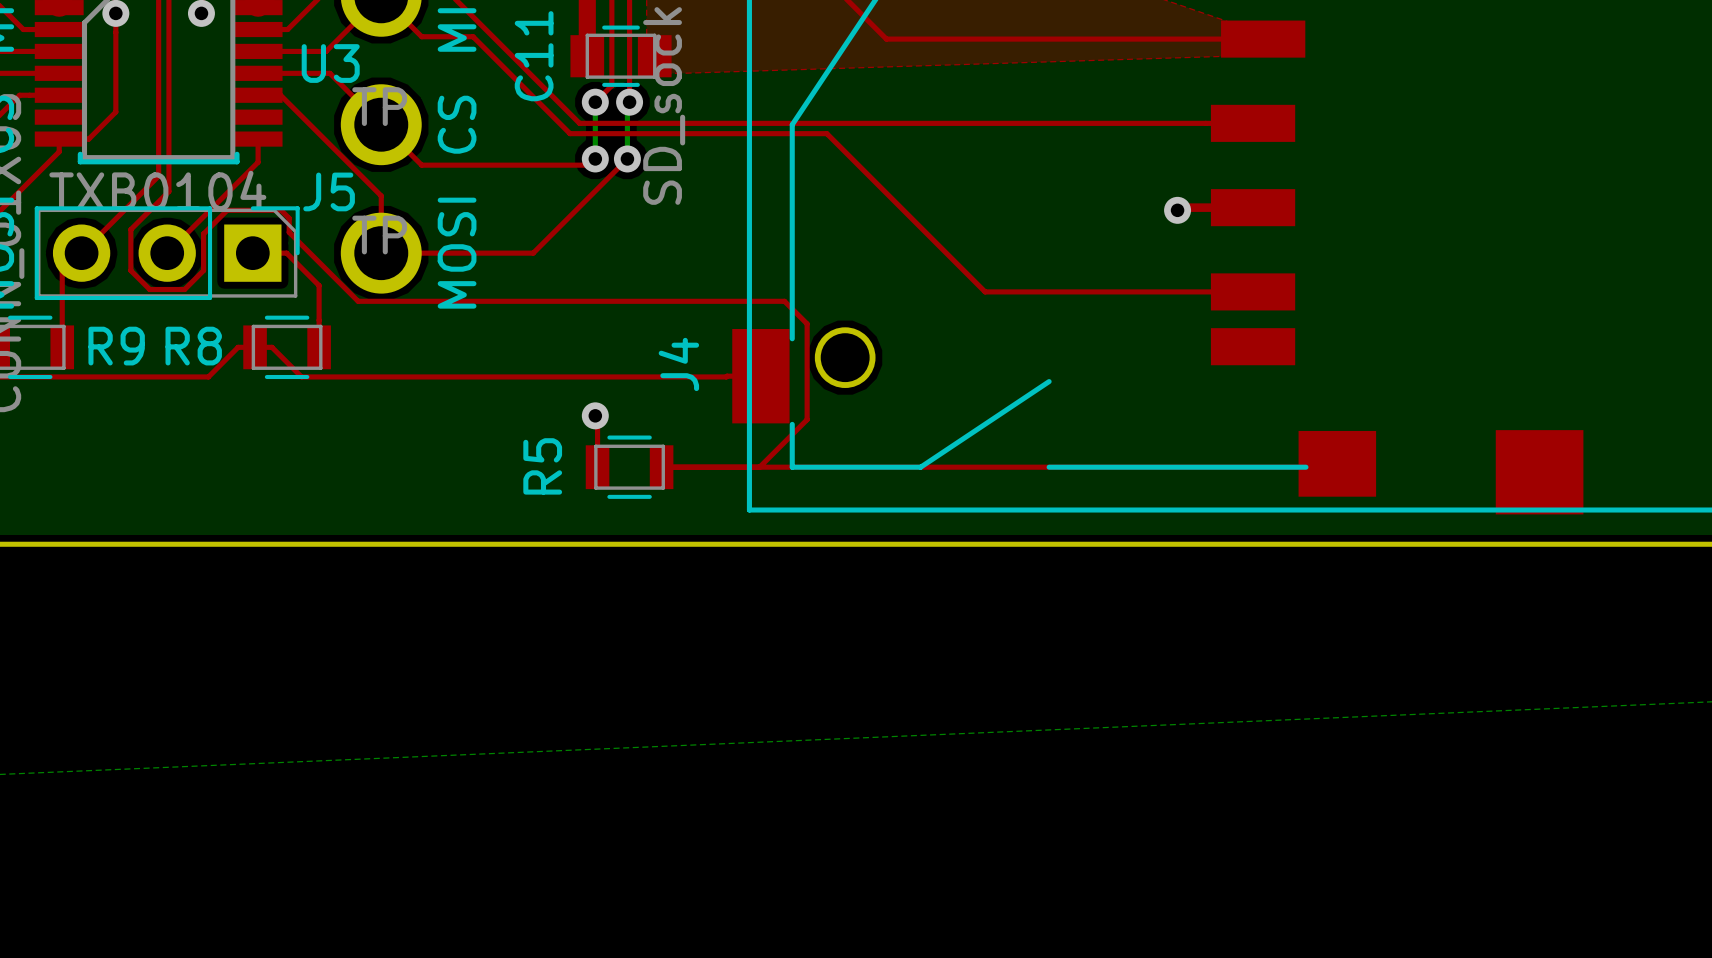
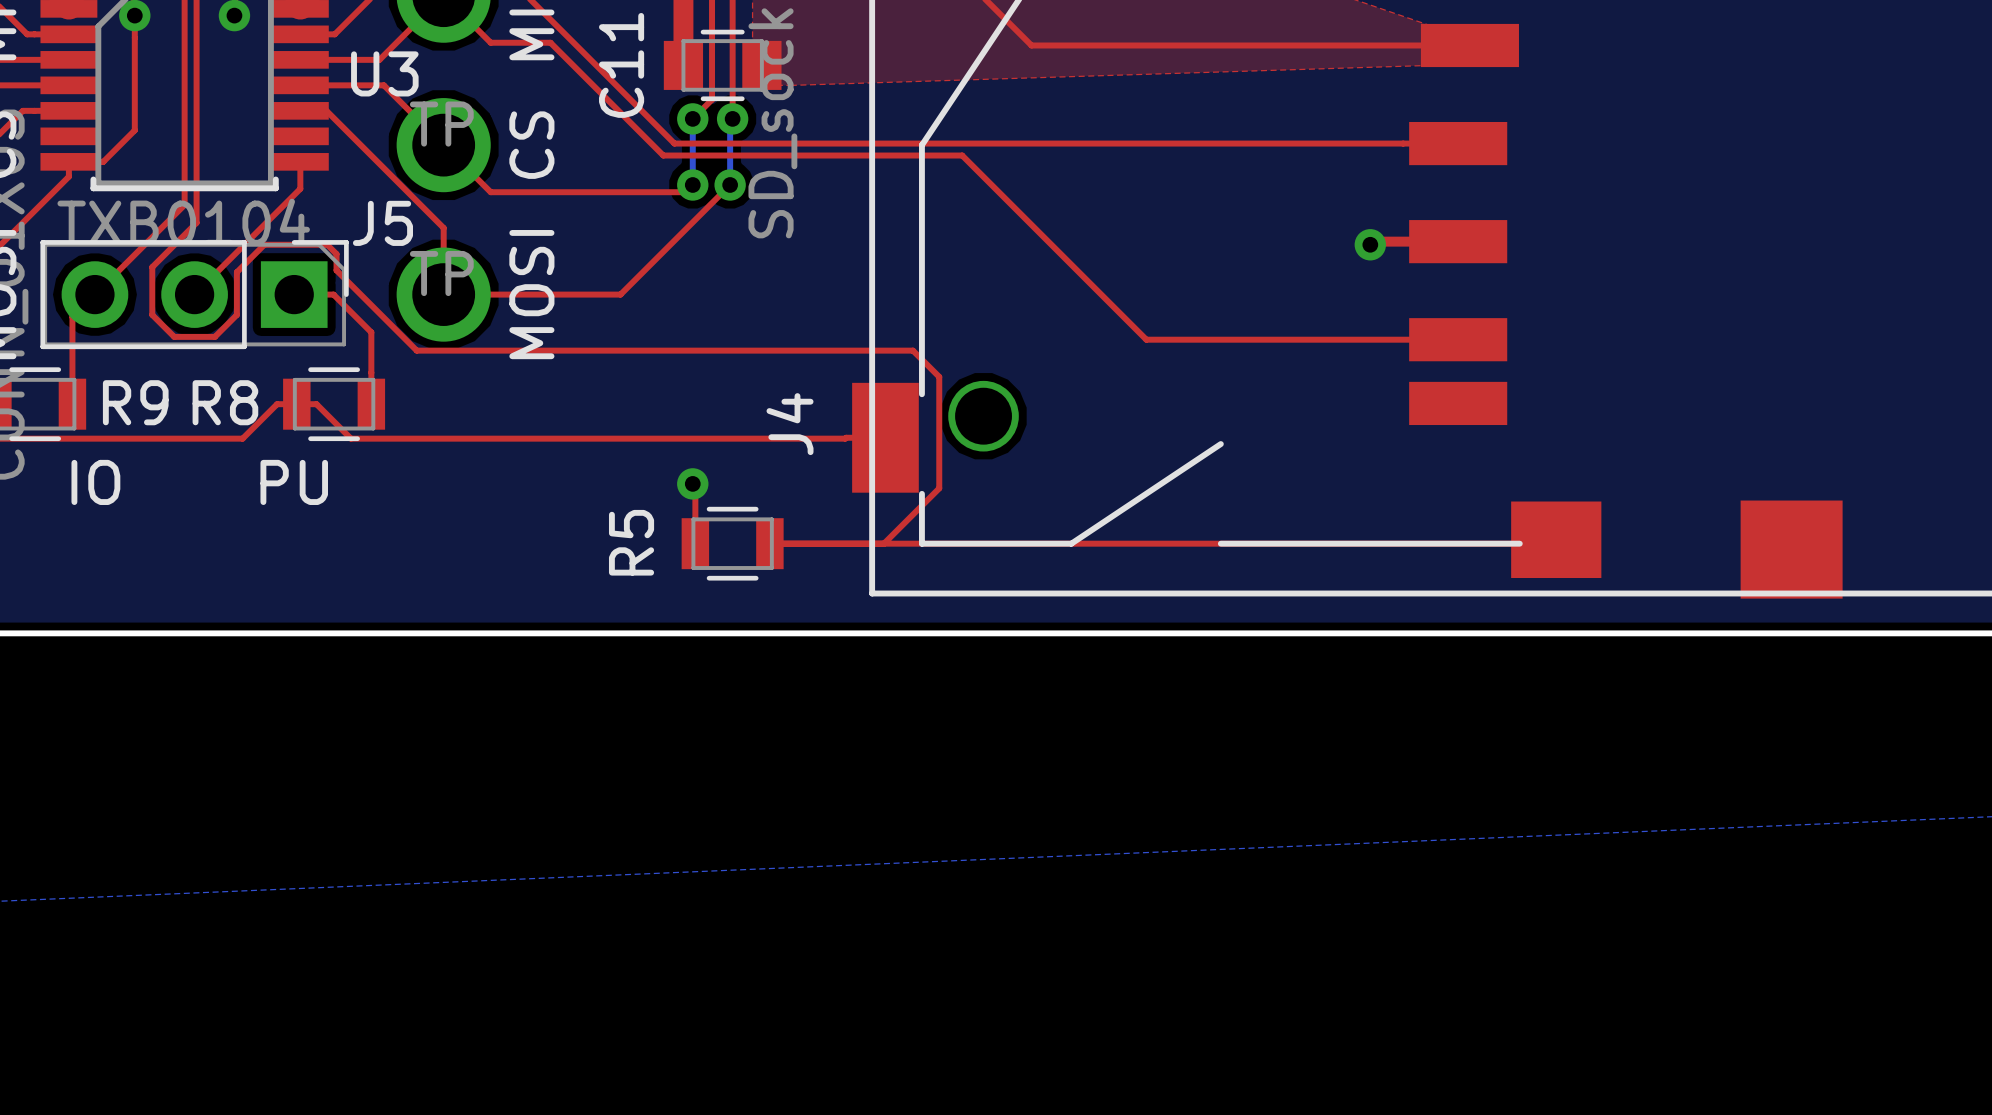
text: none -> IO (95, 482)
text: none -> PU (294, 482)

